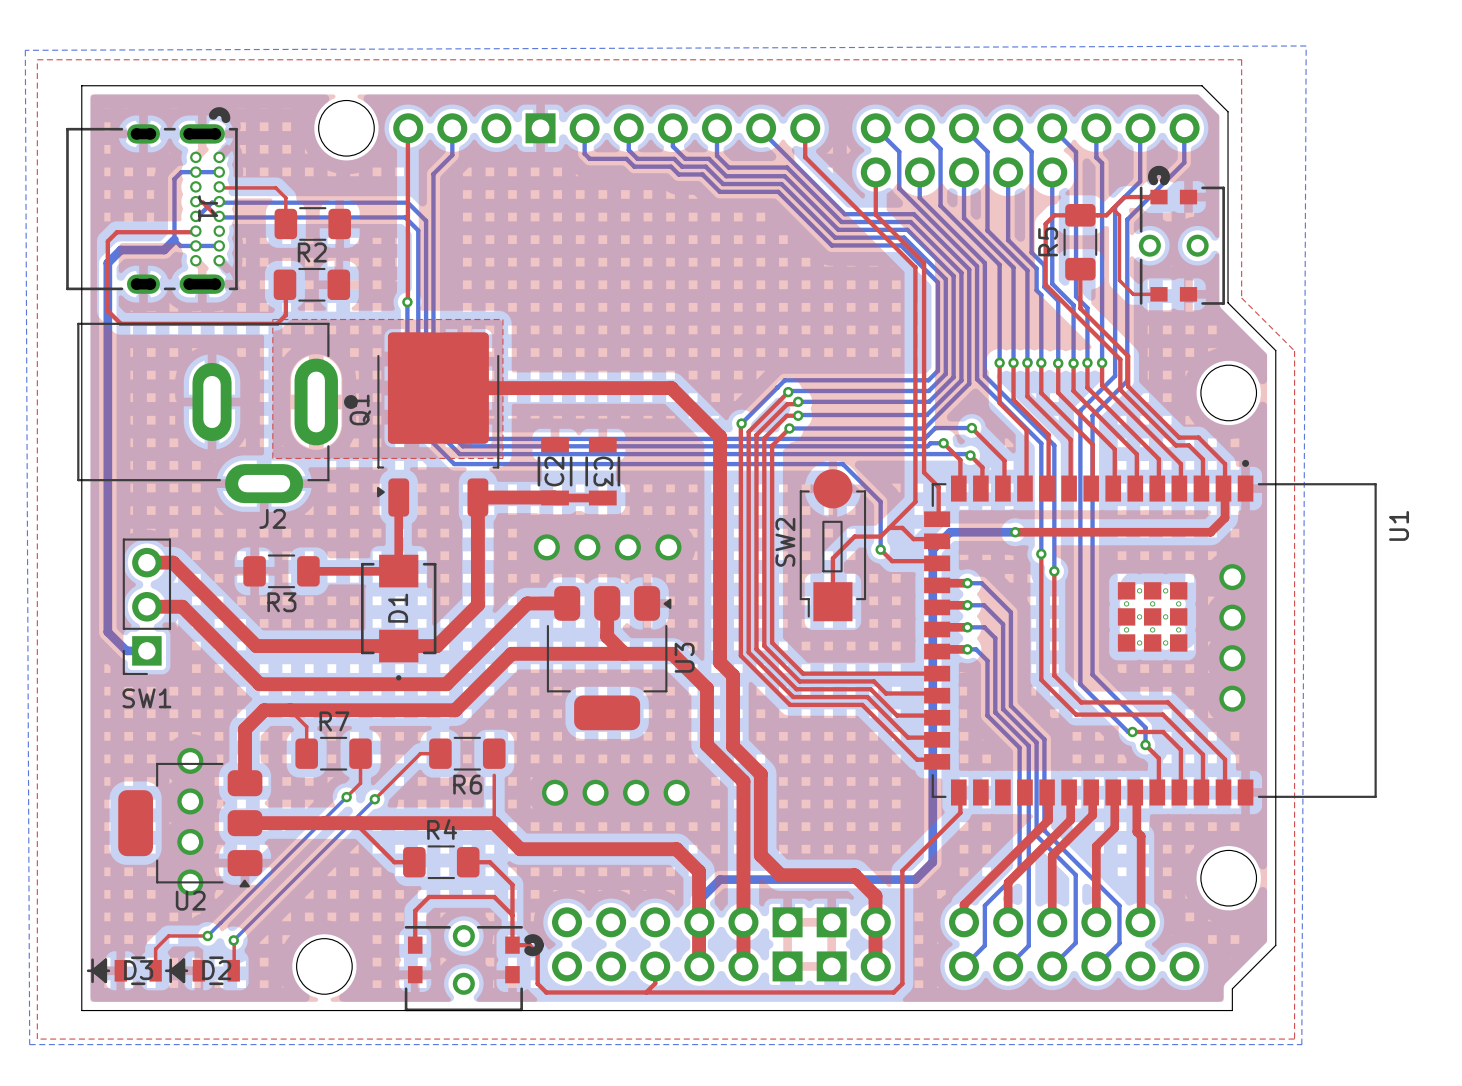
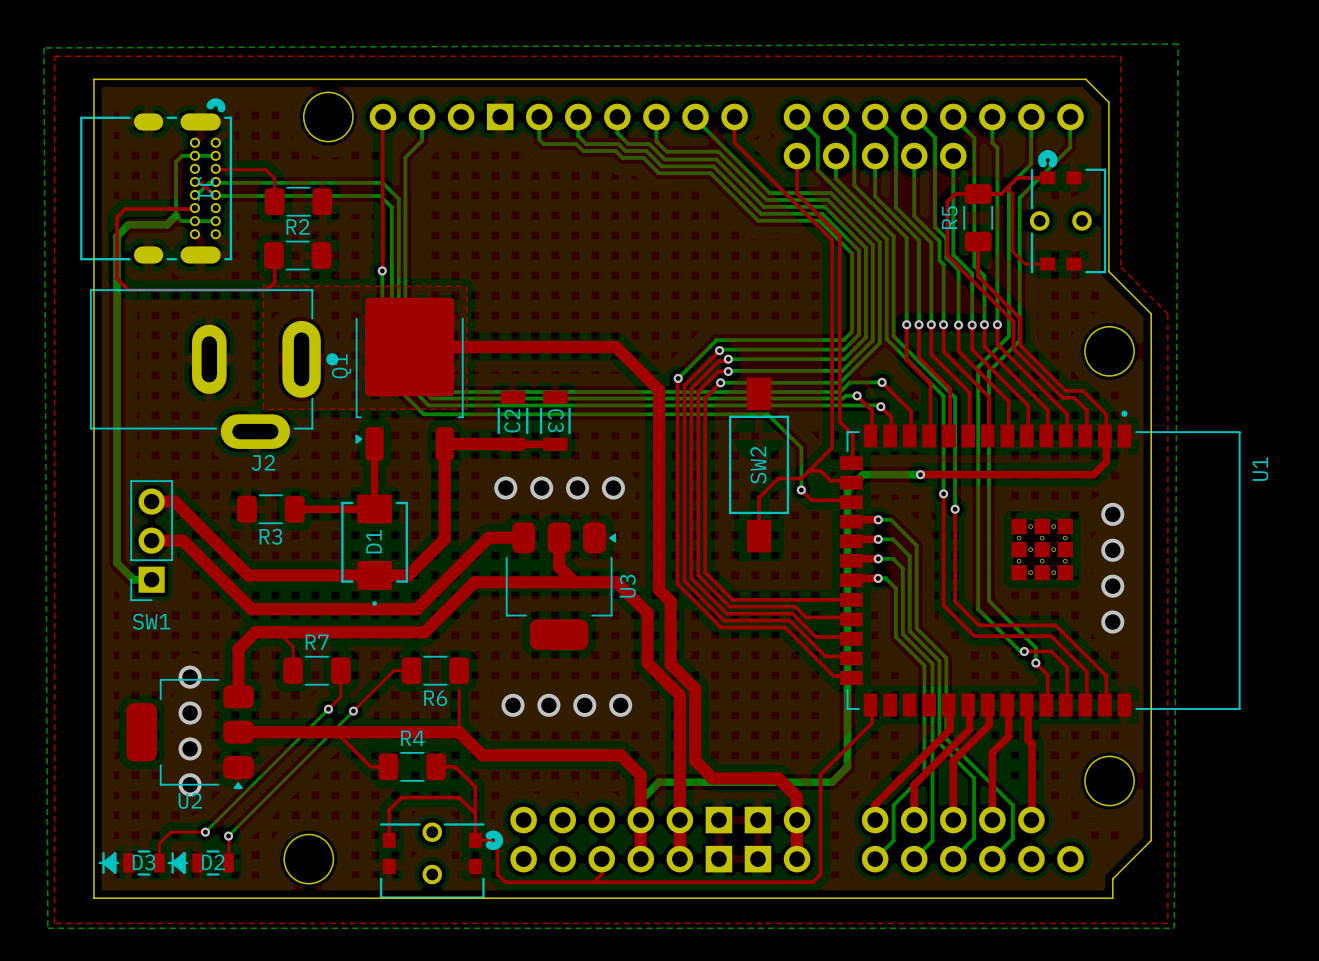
SW2 footprint: [799, 469, 867, 622] -> [728, 377, 790, 553]
SW2 name position: SW2 (785, 542) -> SW2 (758, 465)

